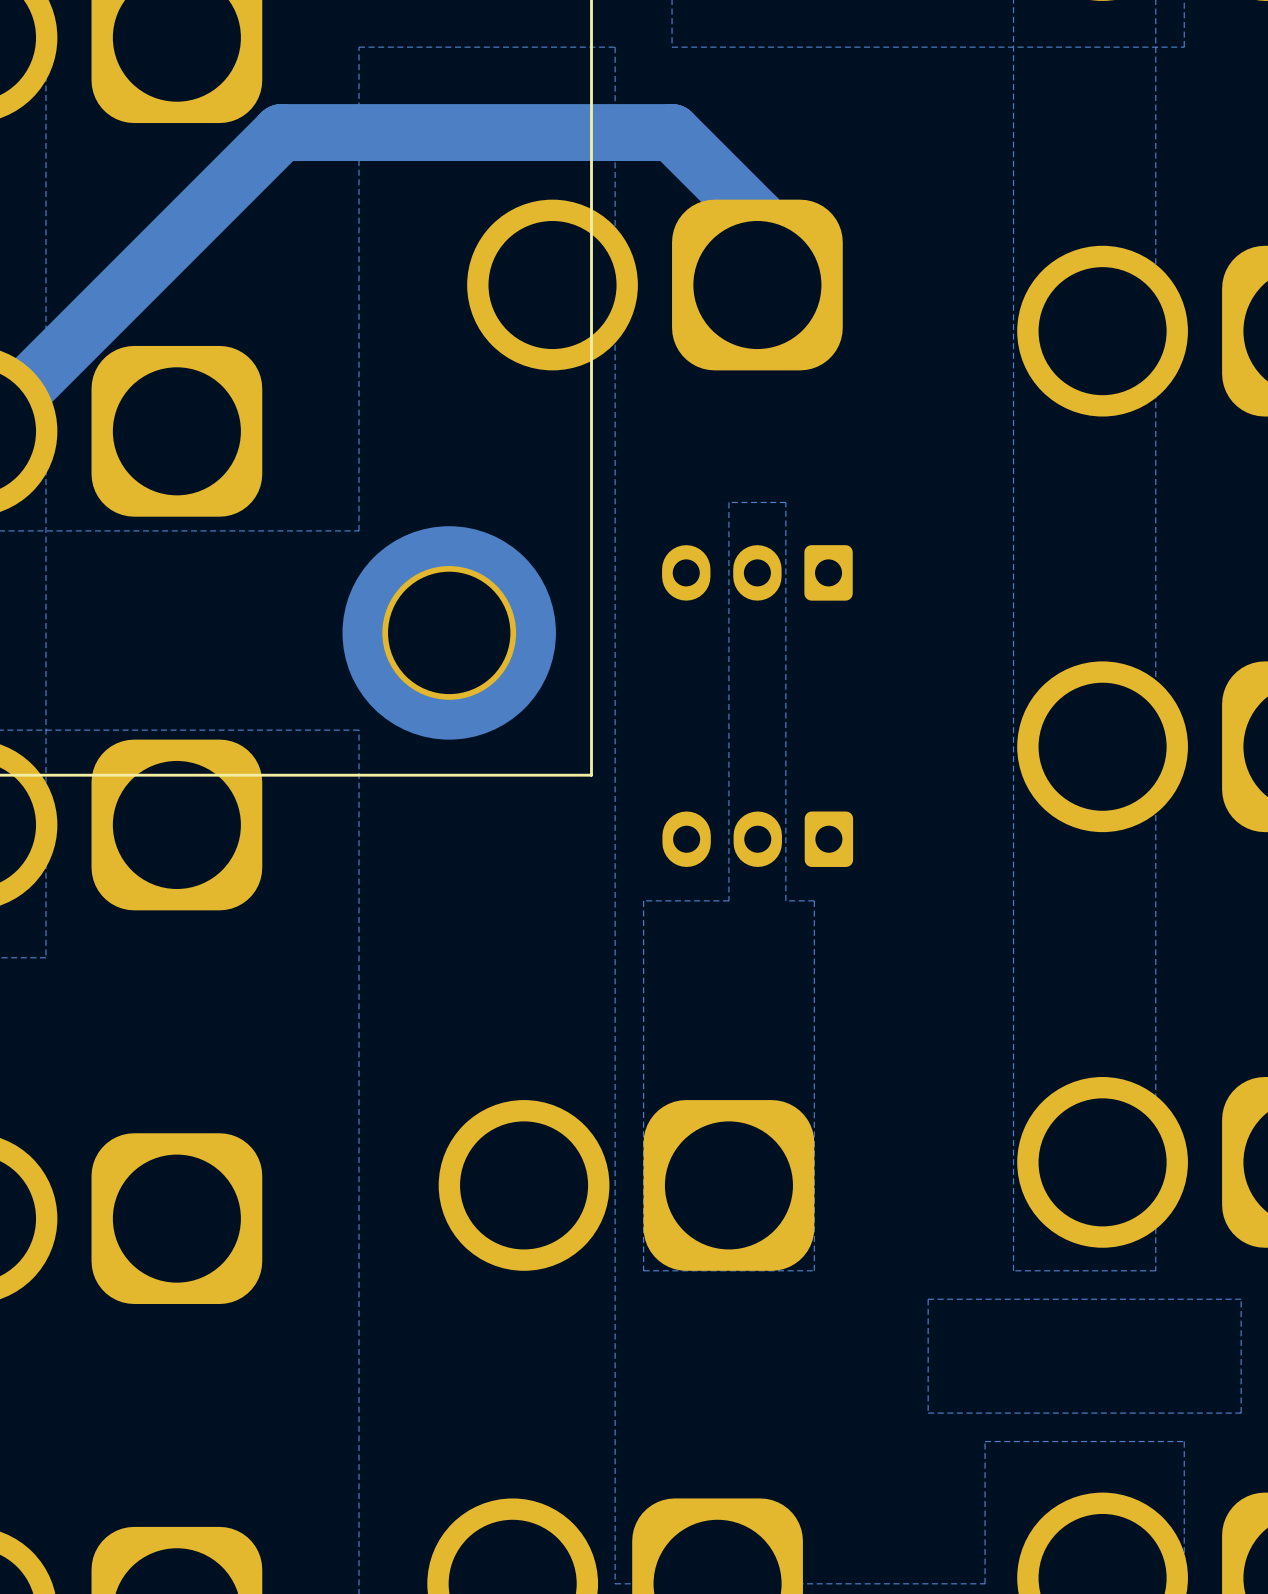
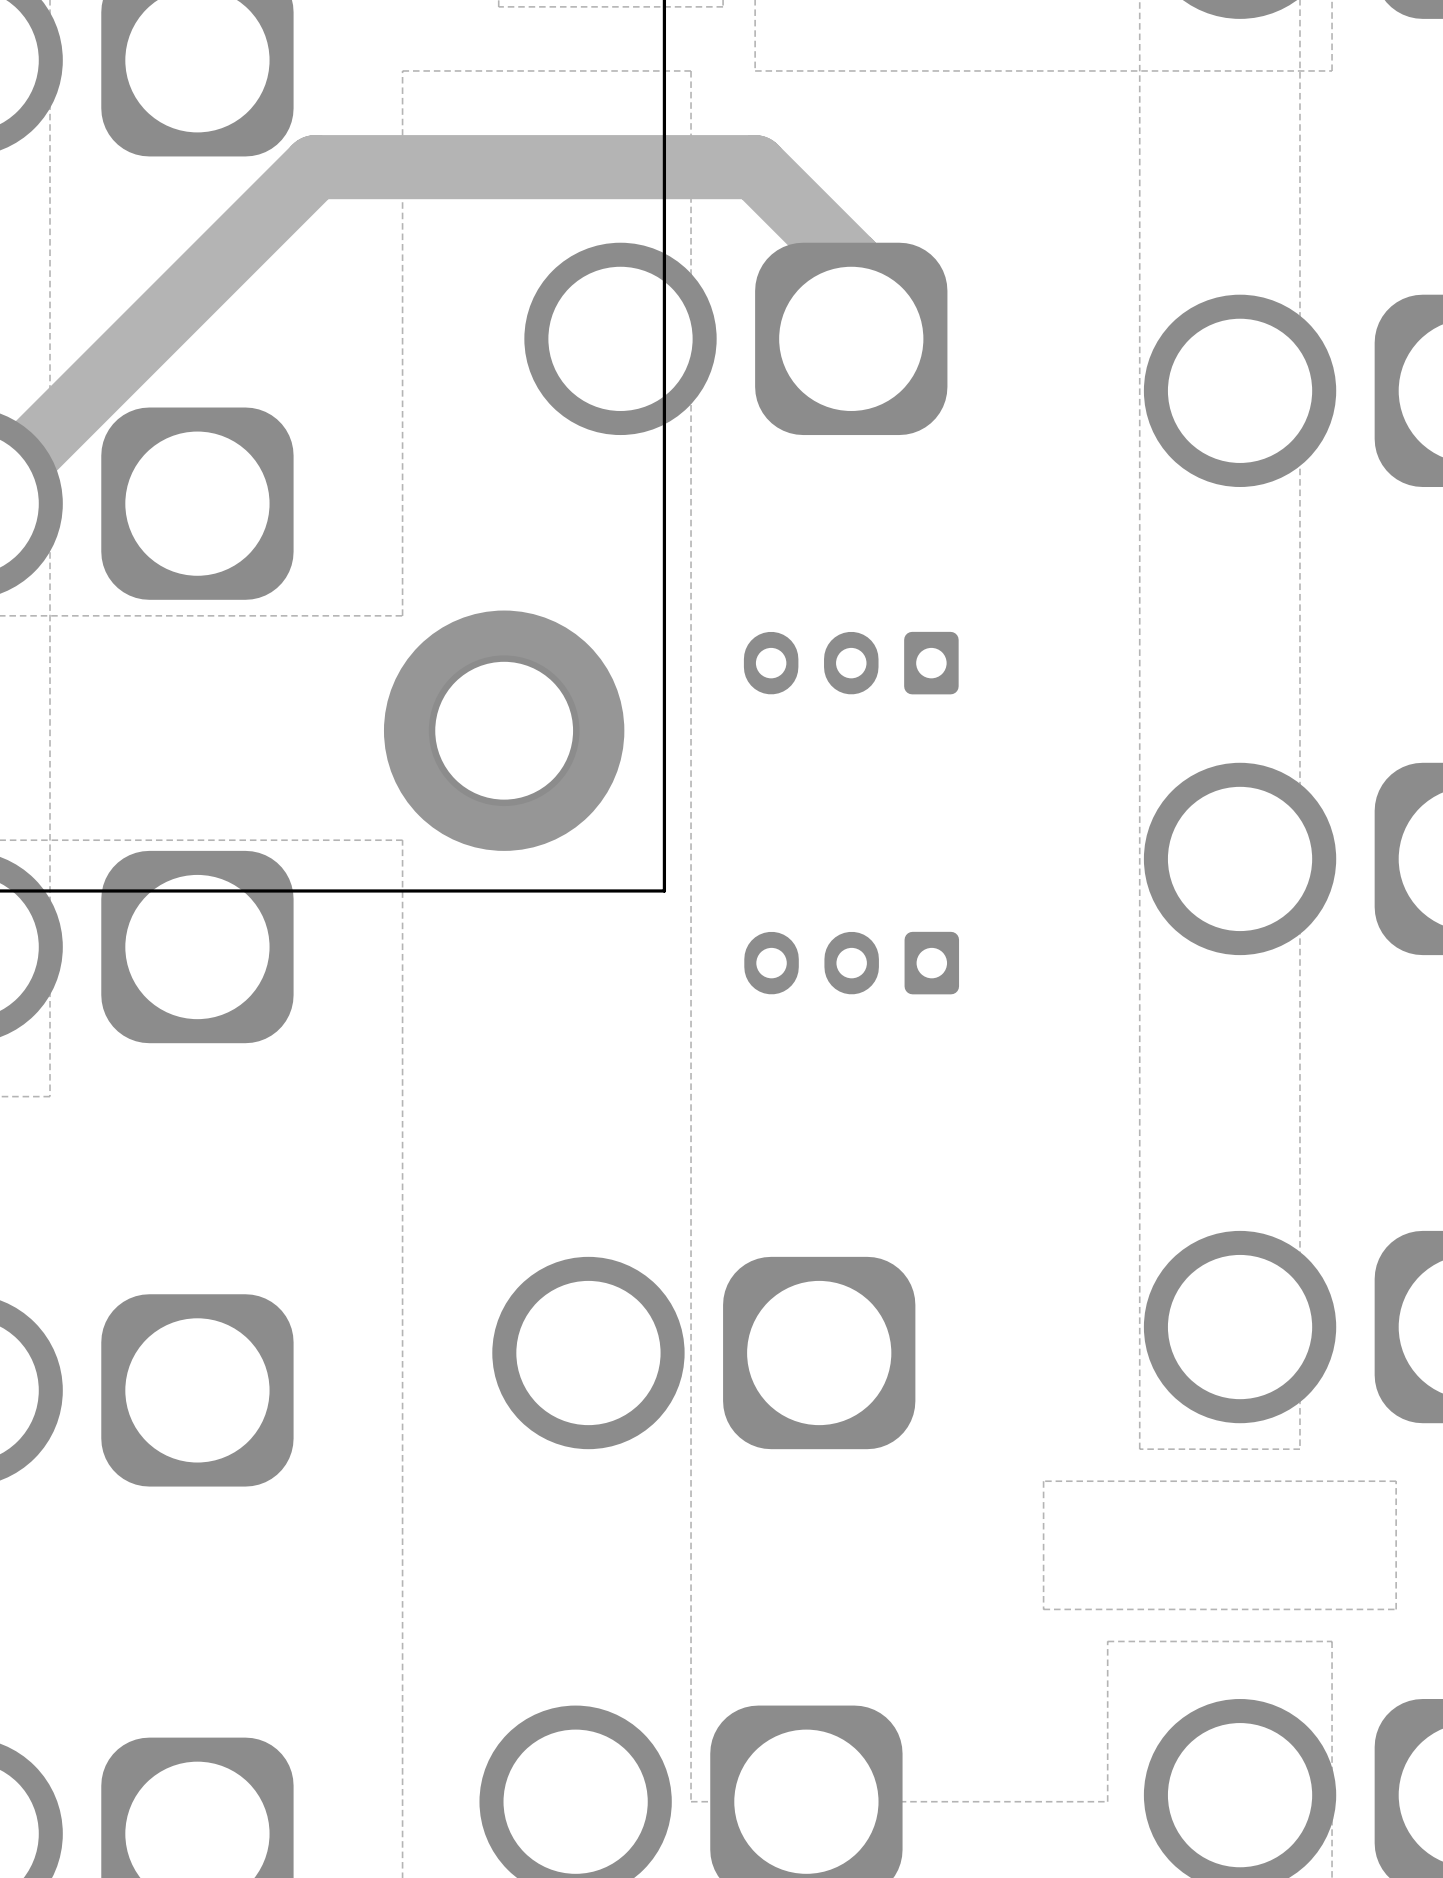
zone outline: (785, 502) (785, 900) (814, 900) (814, 1270) (643, 1270) (643, 900) (728, 900) (728, 502) (785, 502) -> none

